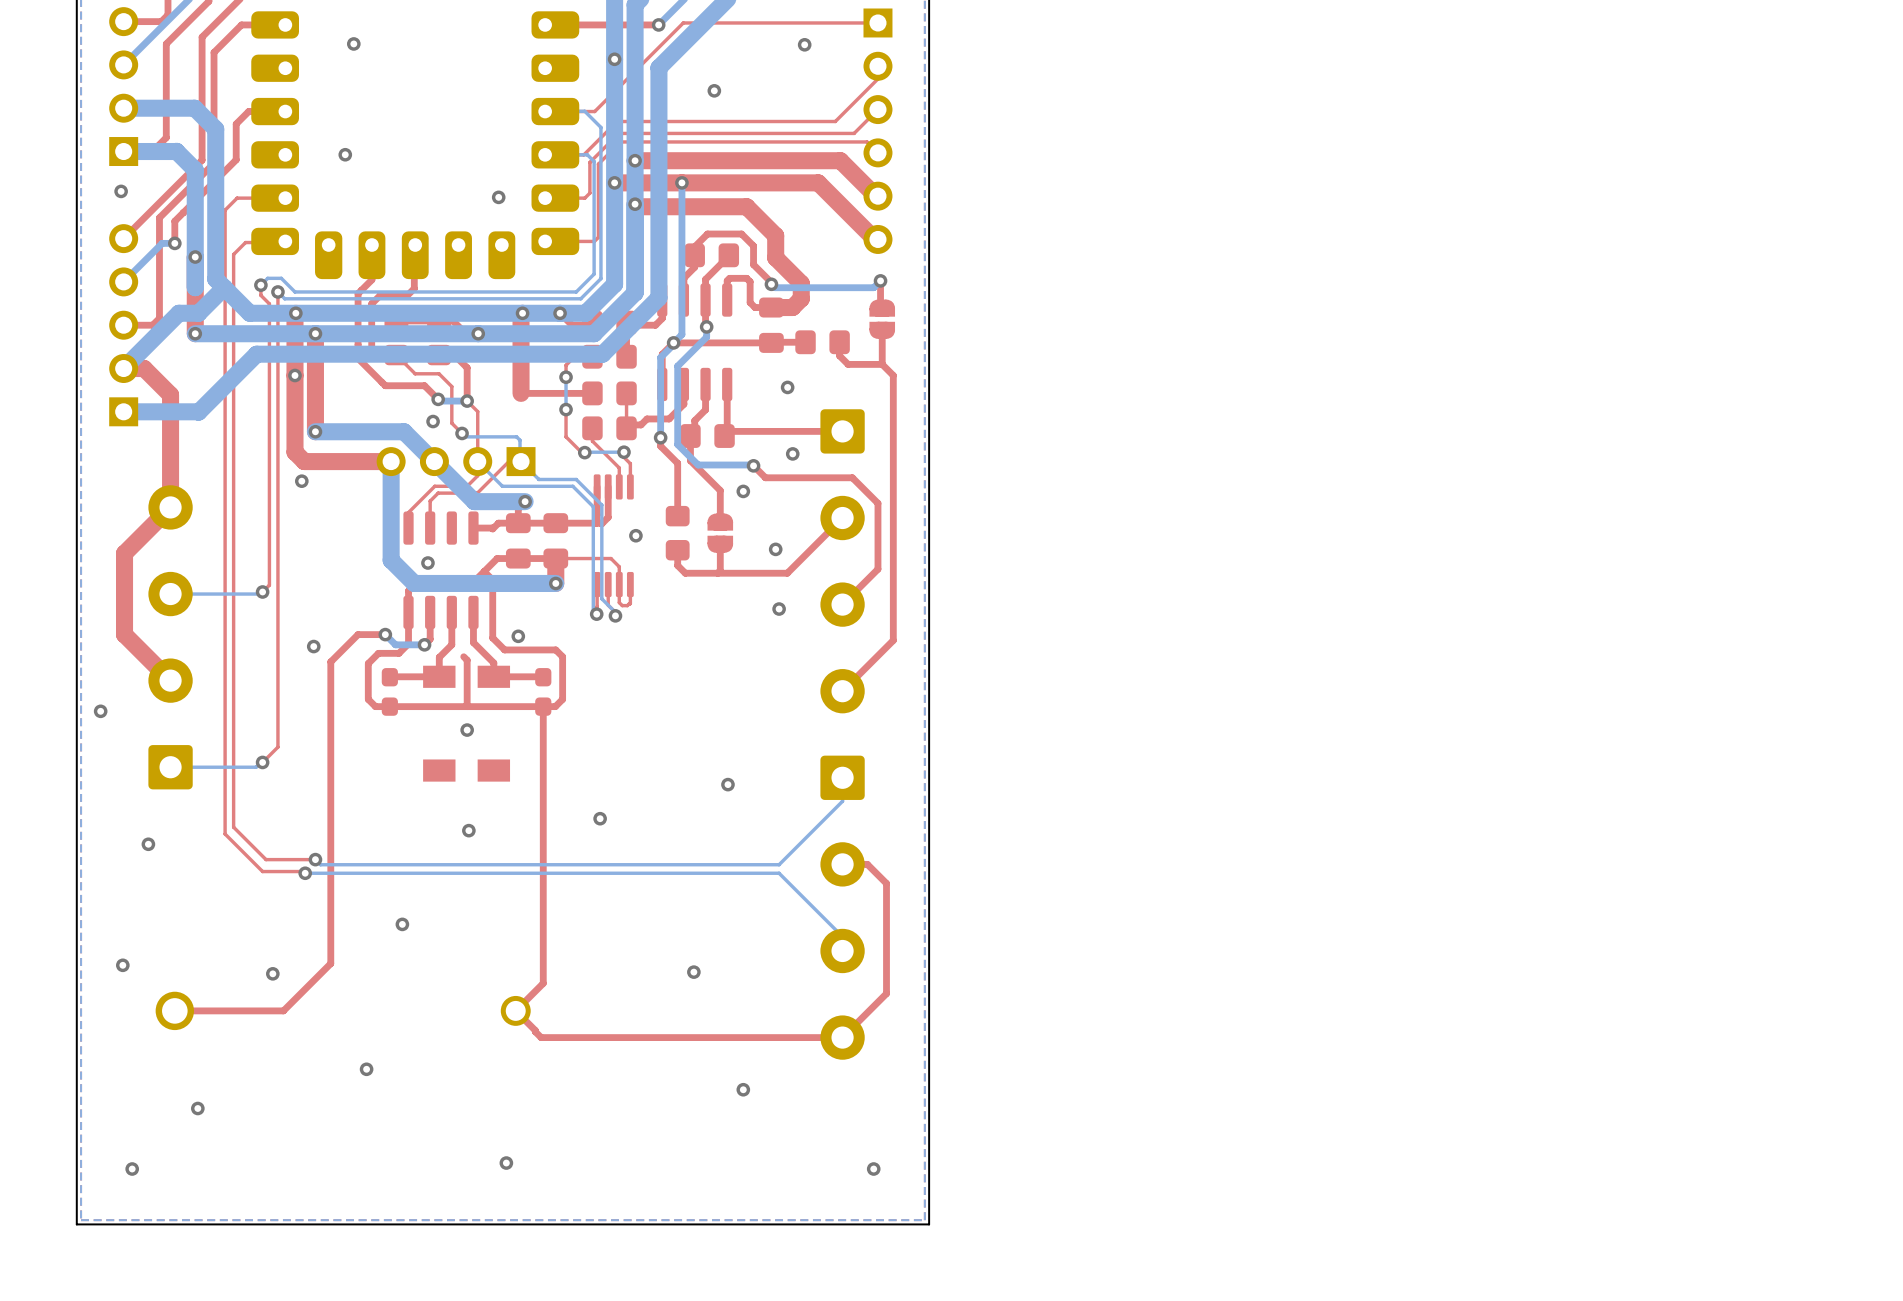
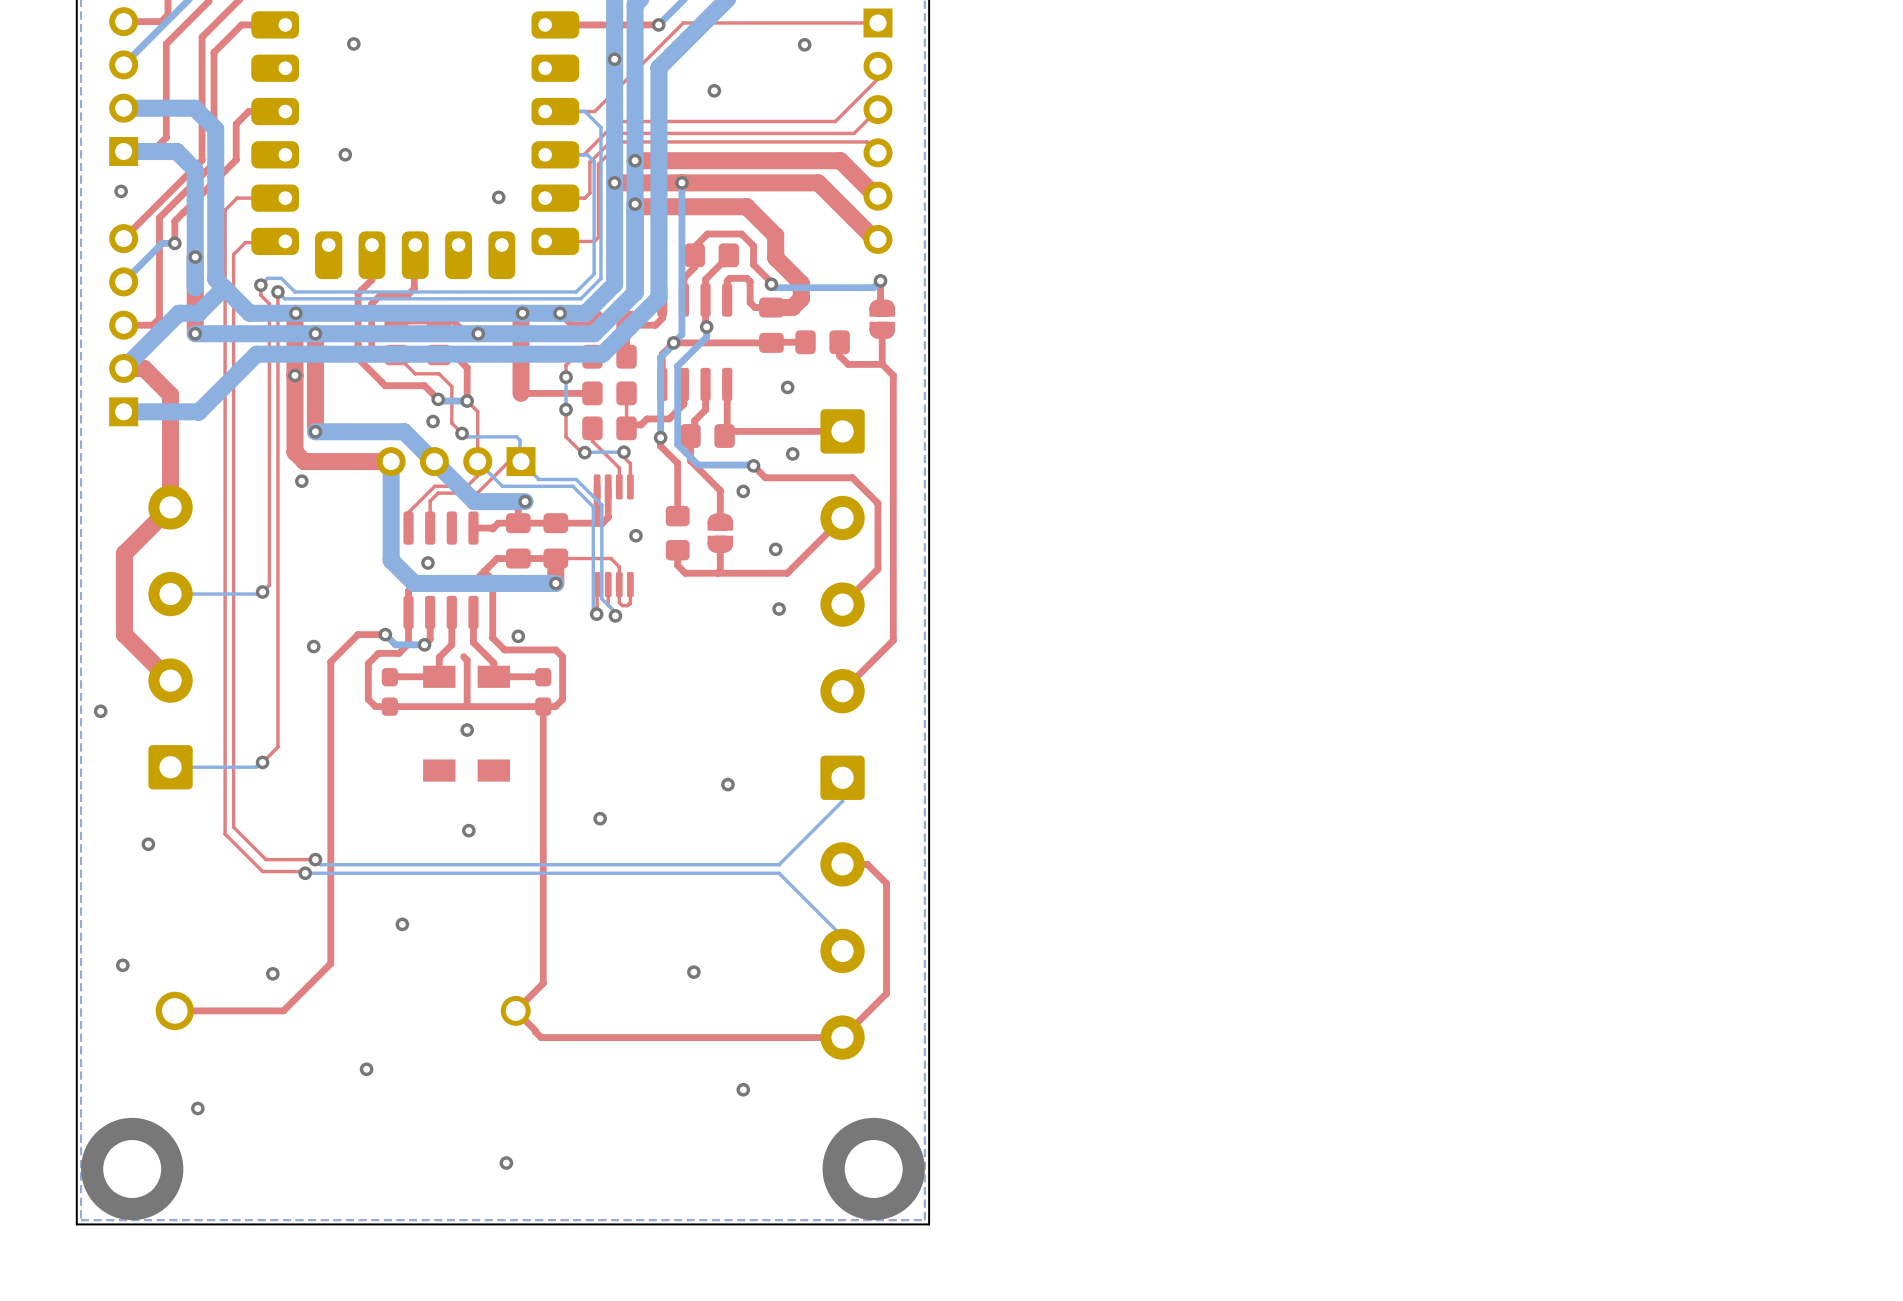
via size: [125, 1162, 140, 1176] -> [81, 1117, 184, 1221]
via size: [866, 1162, 881, 1176] -> [822, 1117, 925, 1221]

